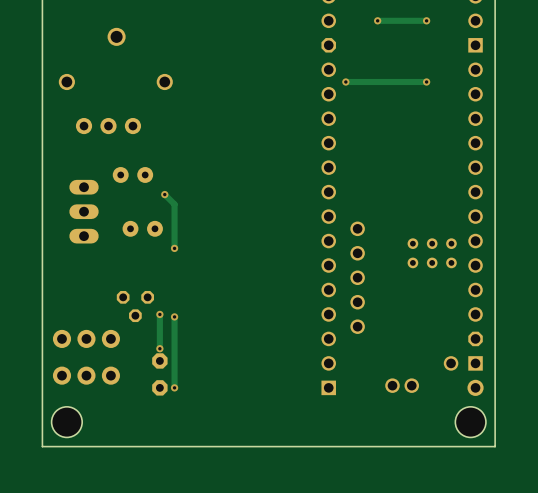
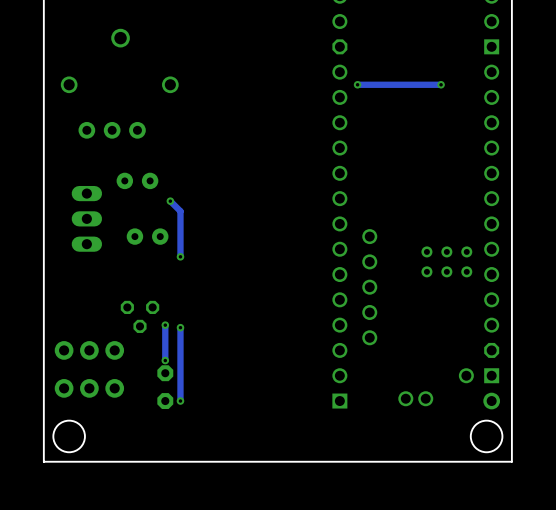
via: (377, 20) -> none
track: (426, 20) (377, 20) -> none
via: (426, 20) -> none

